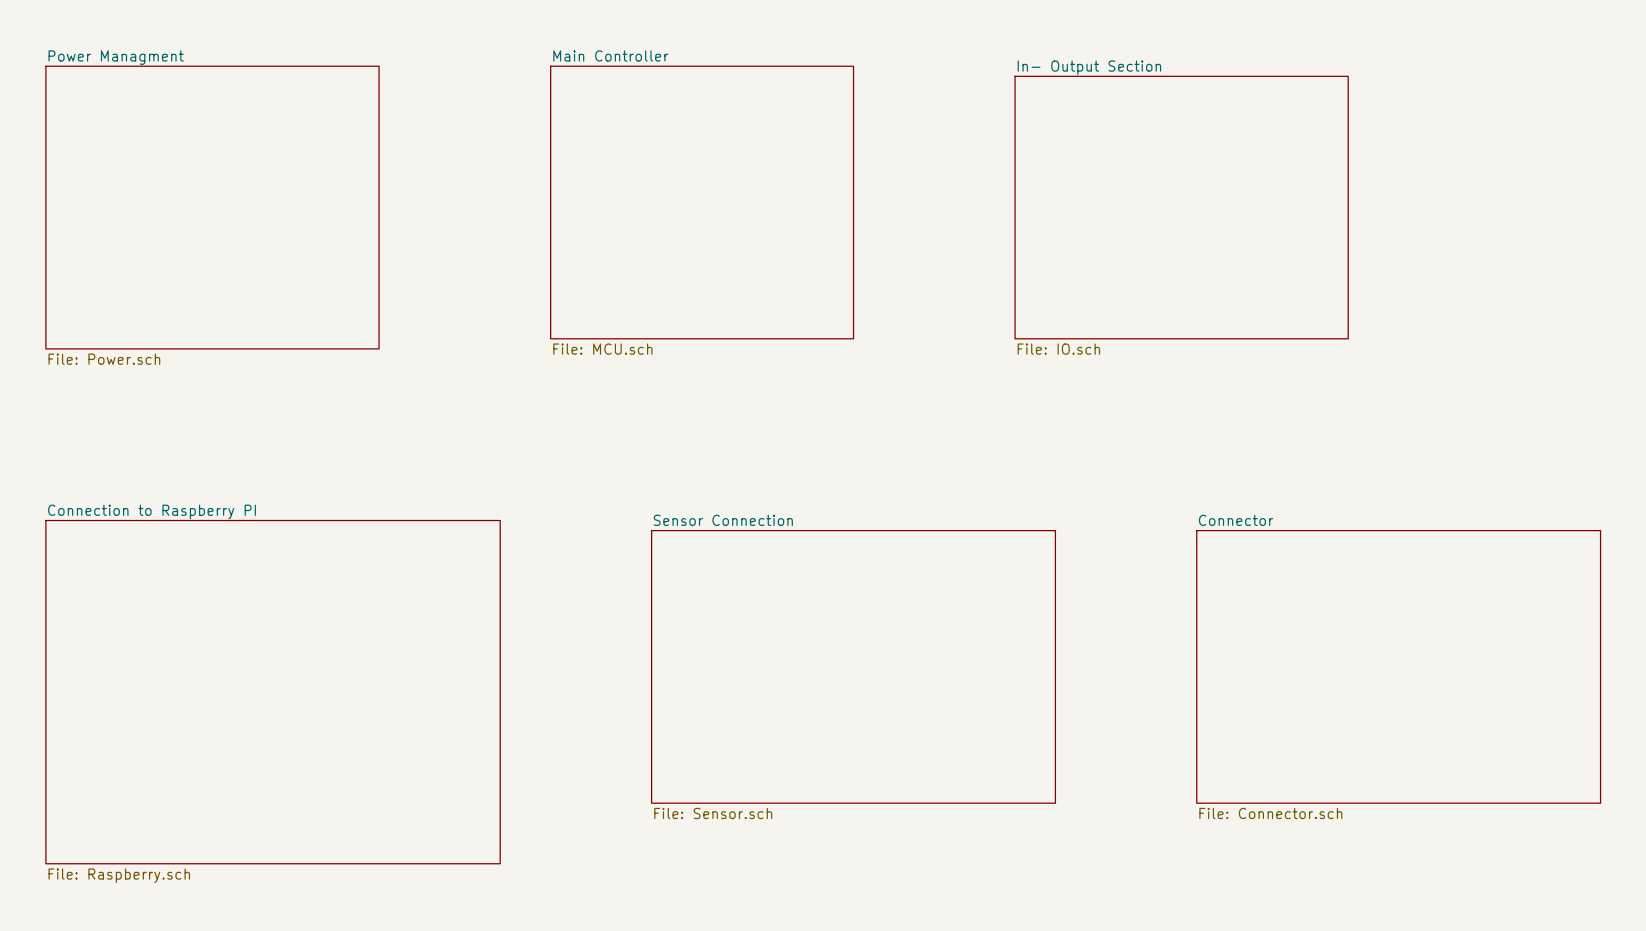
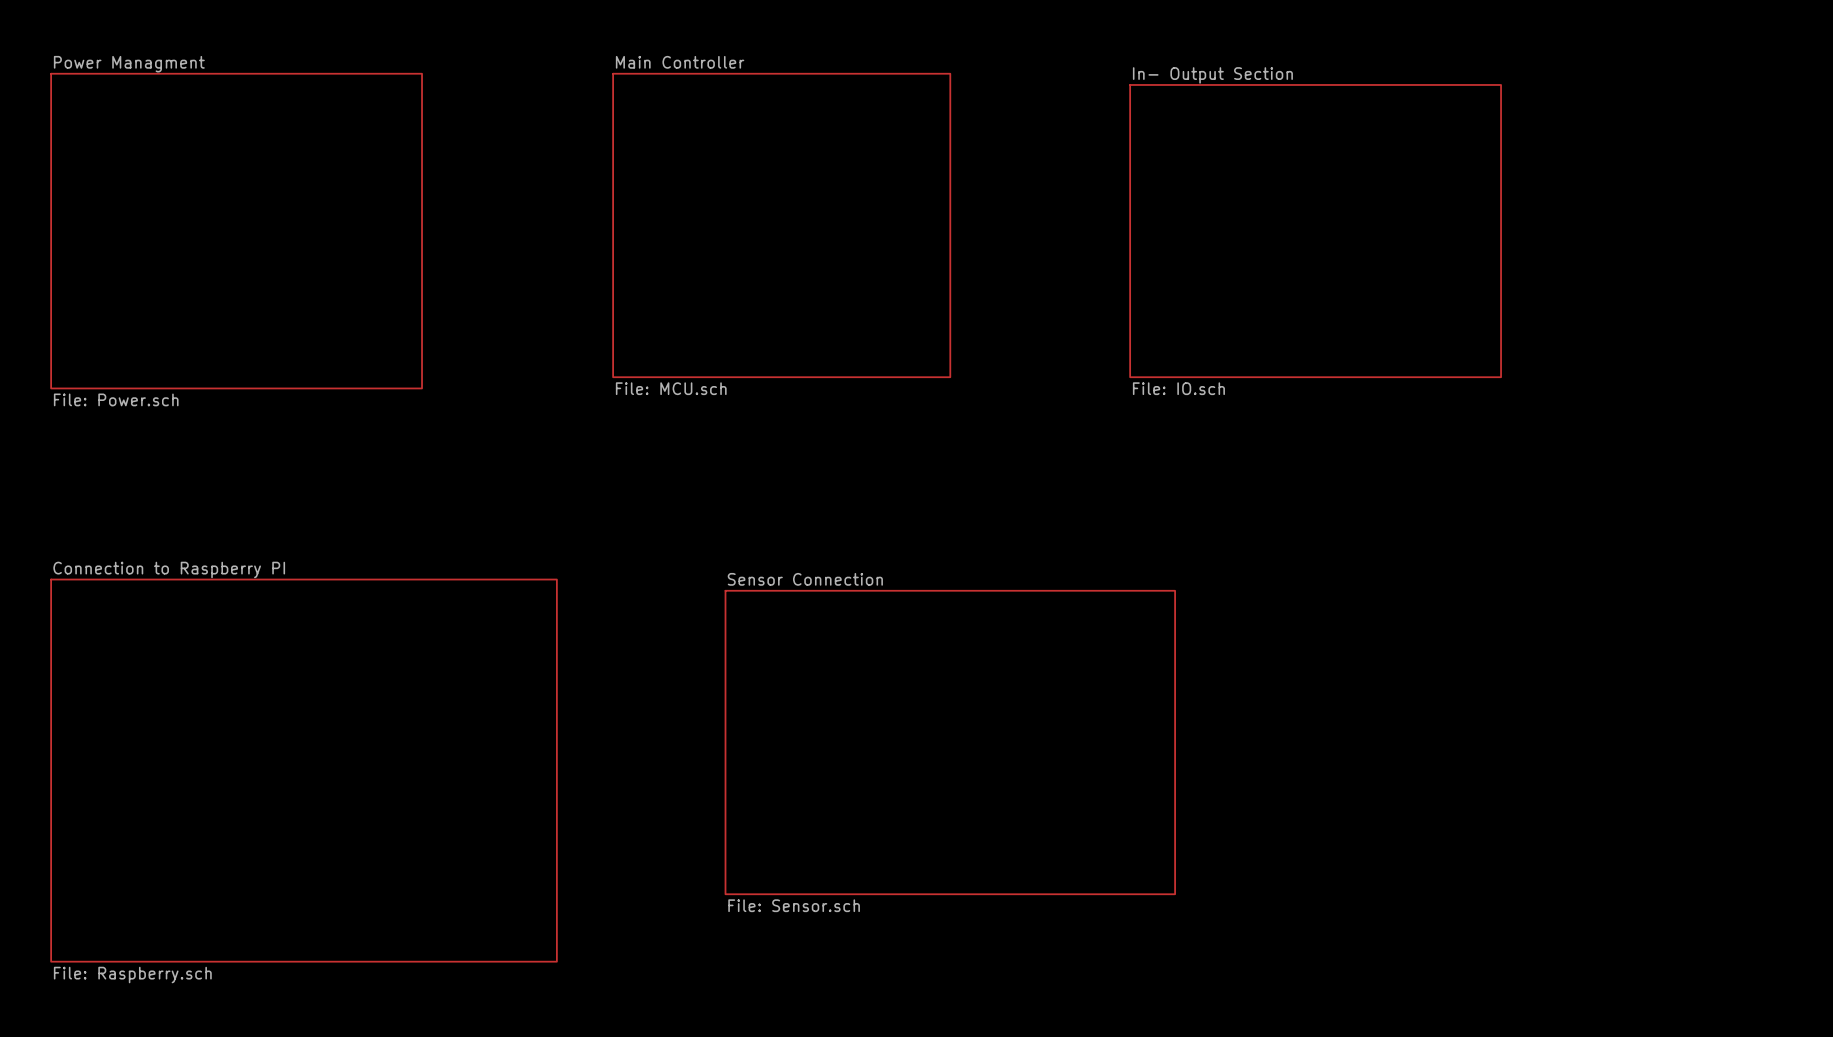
sheet Connector: File: Connector.sch (1398, 666) -> none

